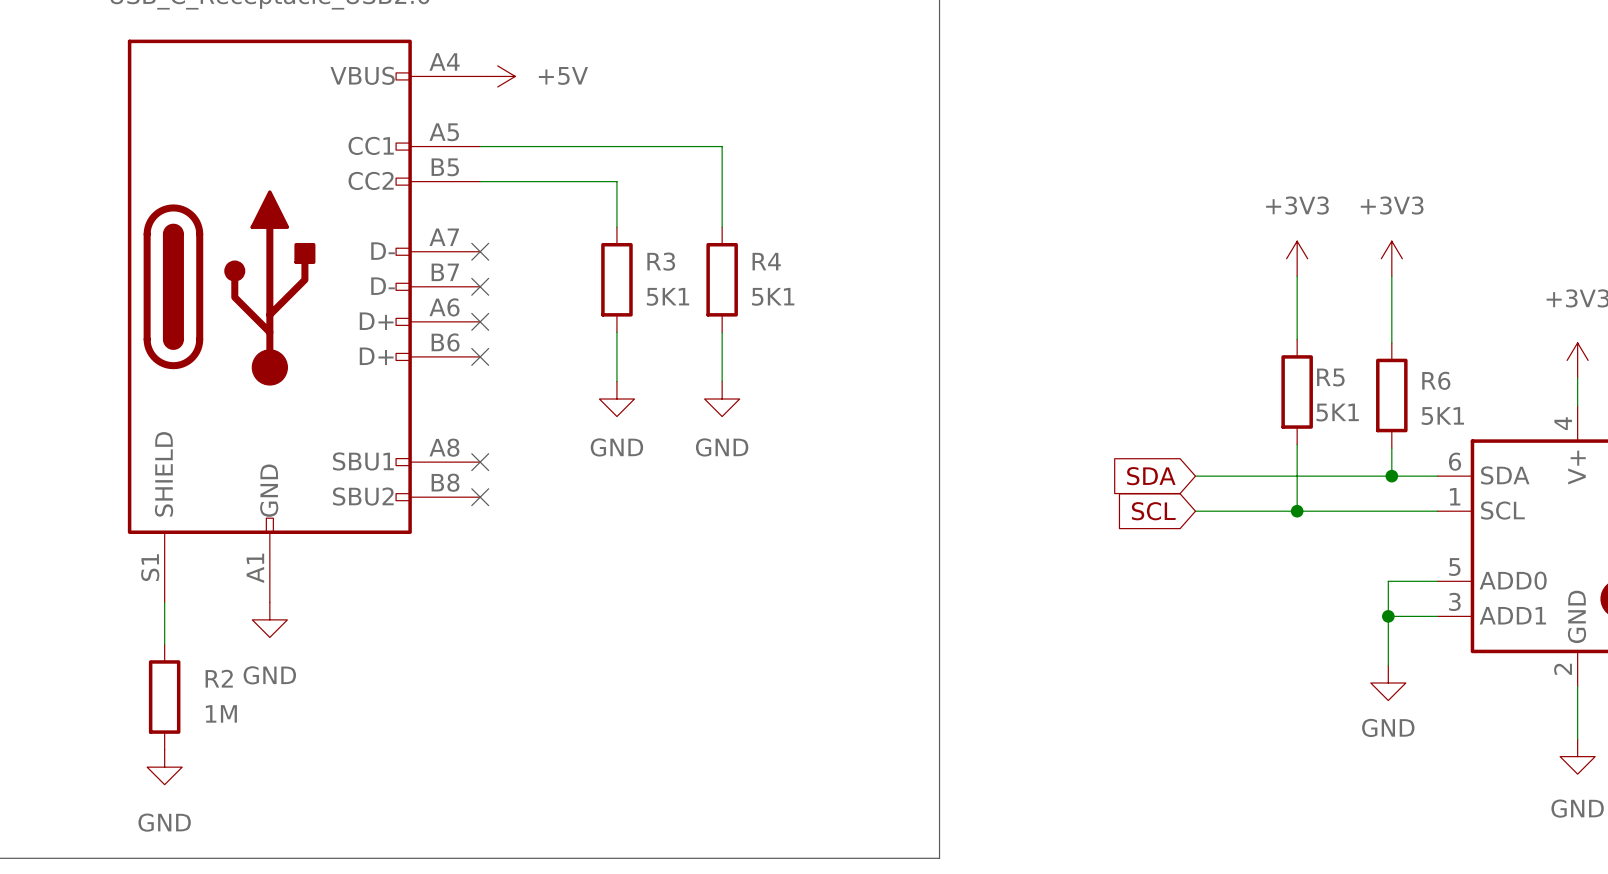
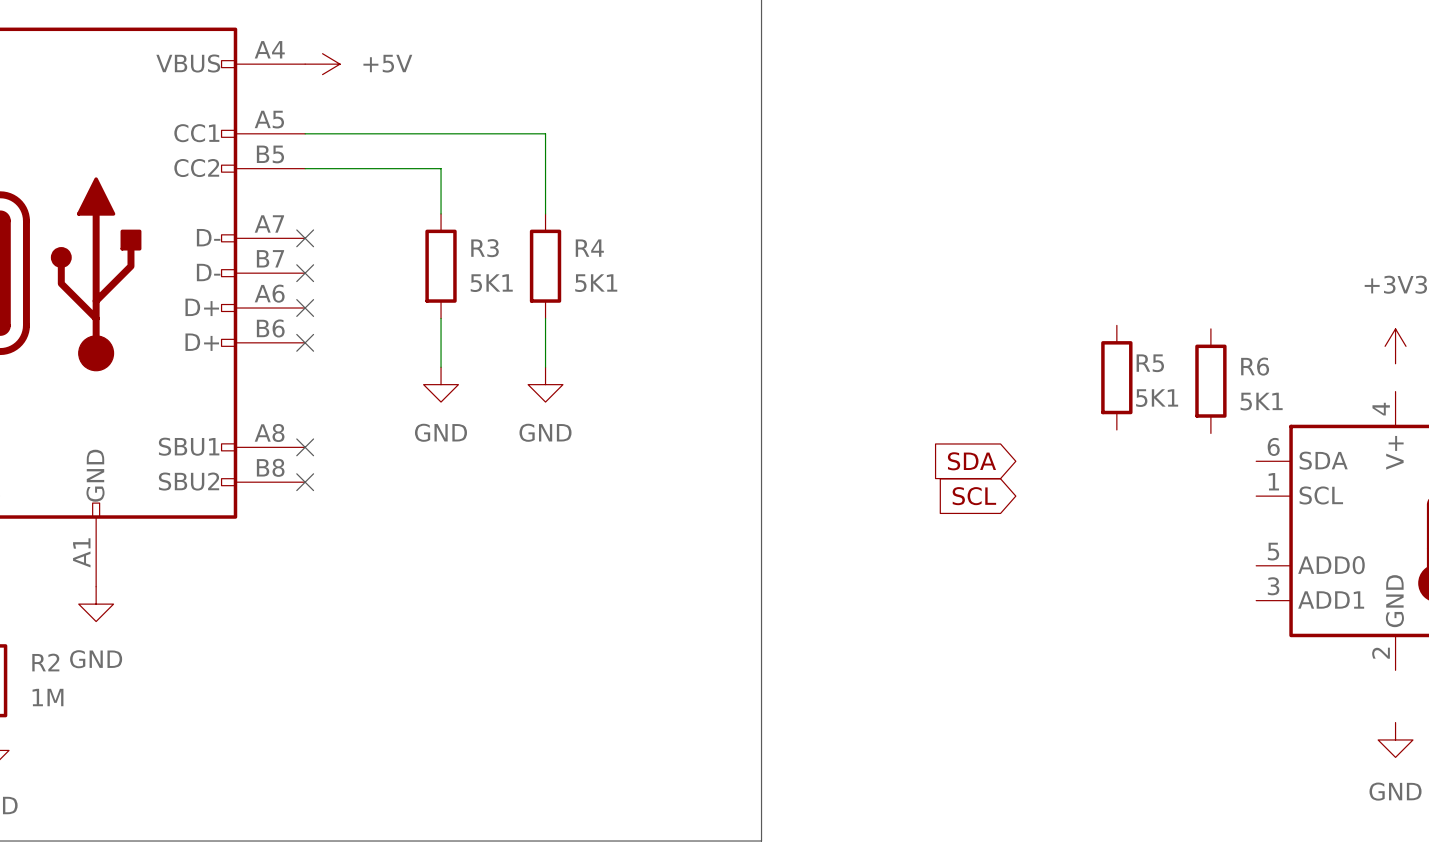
power symbol: +3V3 (1297, 258) -> none
power symbol: +3V3 (1391, 258) -> none
wire: (1297, 276) (1297, 339) -> none
wire: (1391, 276) (1391, 342) -> none
wire: (1577, 377) (1577, 406) -> none
wire: (1297, 444) (1297, 511) -> none
wire: (1391, 448) (1391, 476) -> none
wire: (1195, 476) (1437, 476) -> none
junction: (1391, 476) -> none
wire: (1195, 511) (1437, 511) -> none
junction: (1297, 511) -> none
wire: (1437, 581) (1388, 581) (1388, 665) -> none
wire: (1388, 616) (1437, 616) -> none
junction: (1388, 616) -> none
power symbol: GND (1388, 683) -> none
wire: (1577, 686) (1577, 739) -> none

